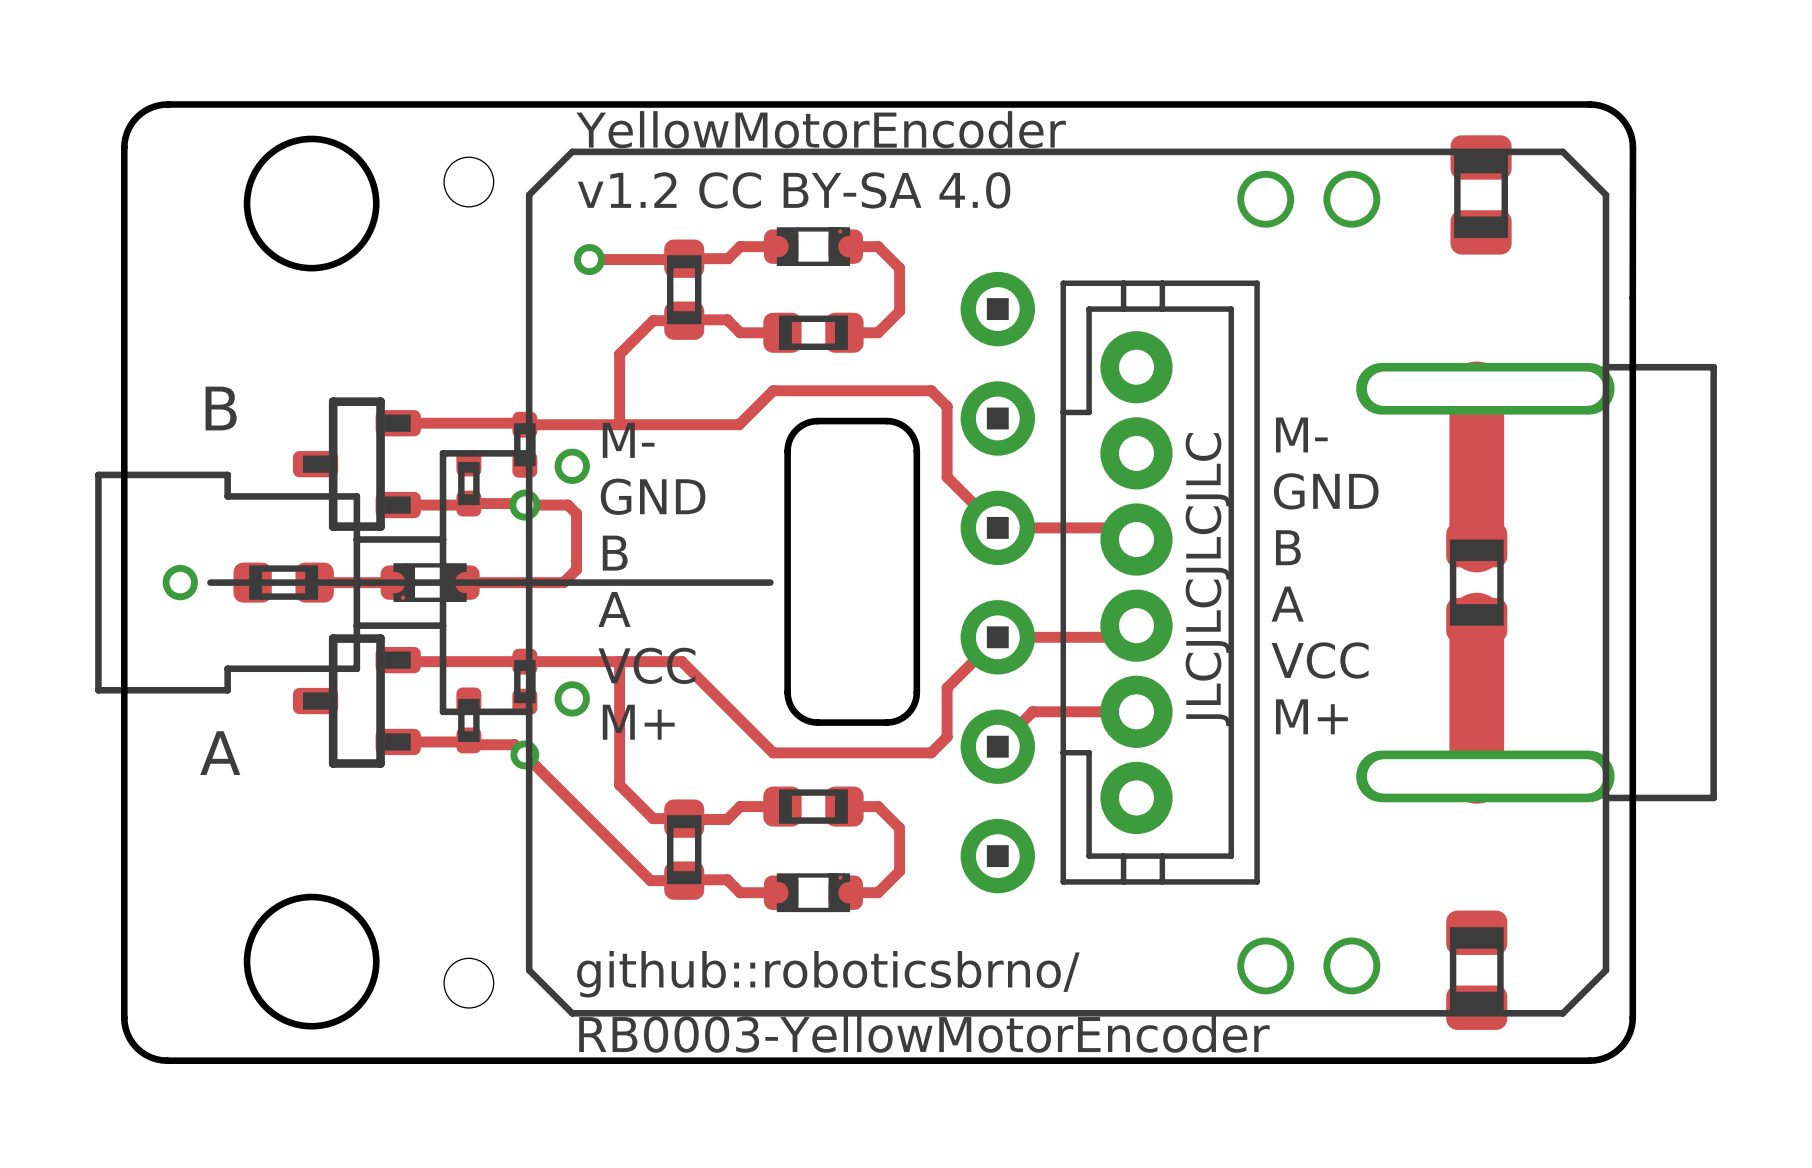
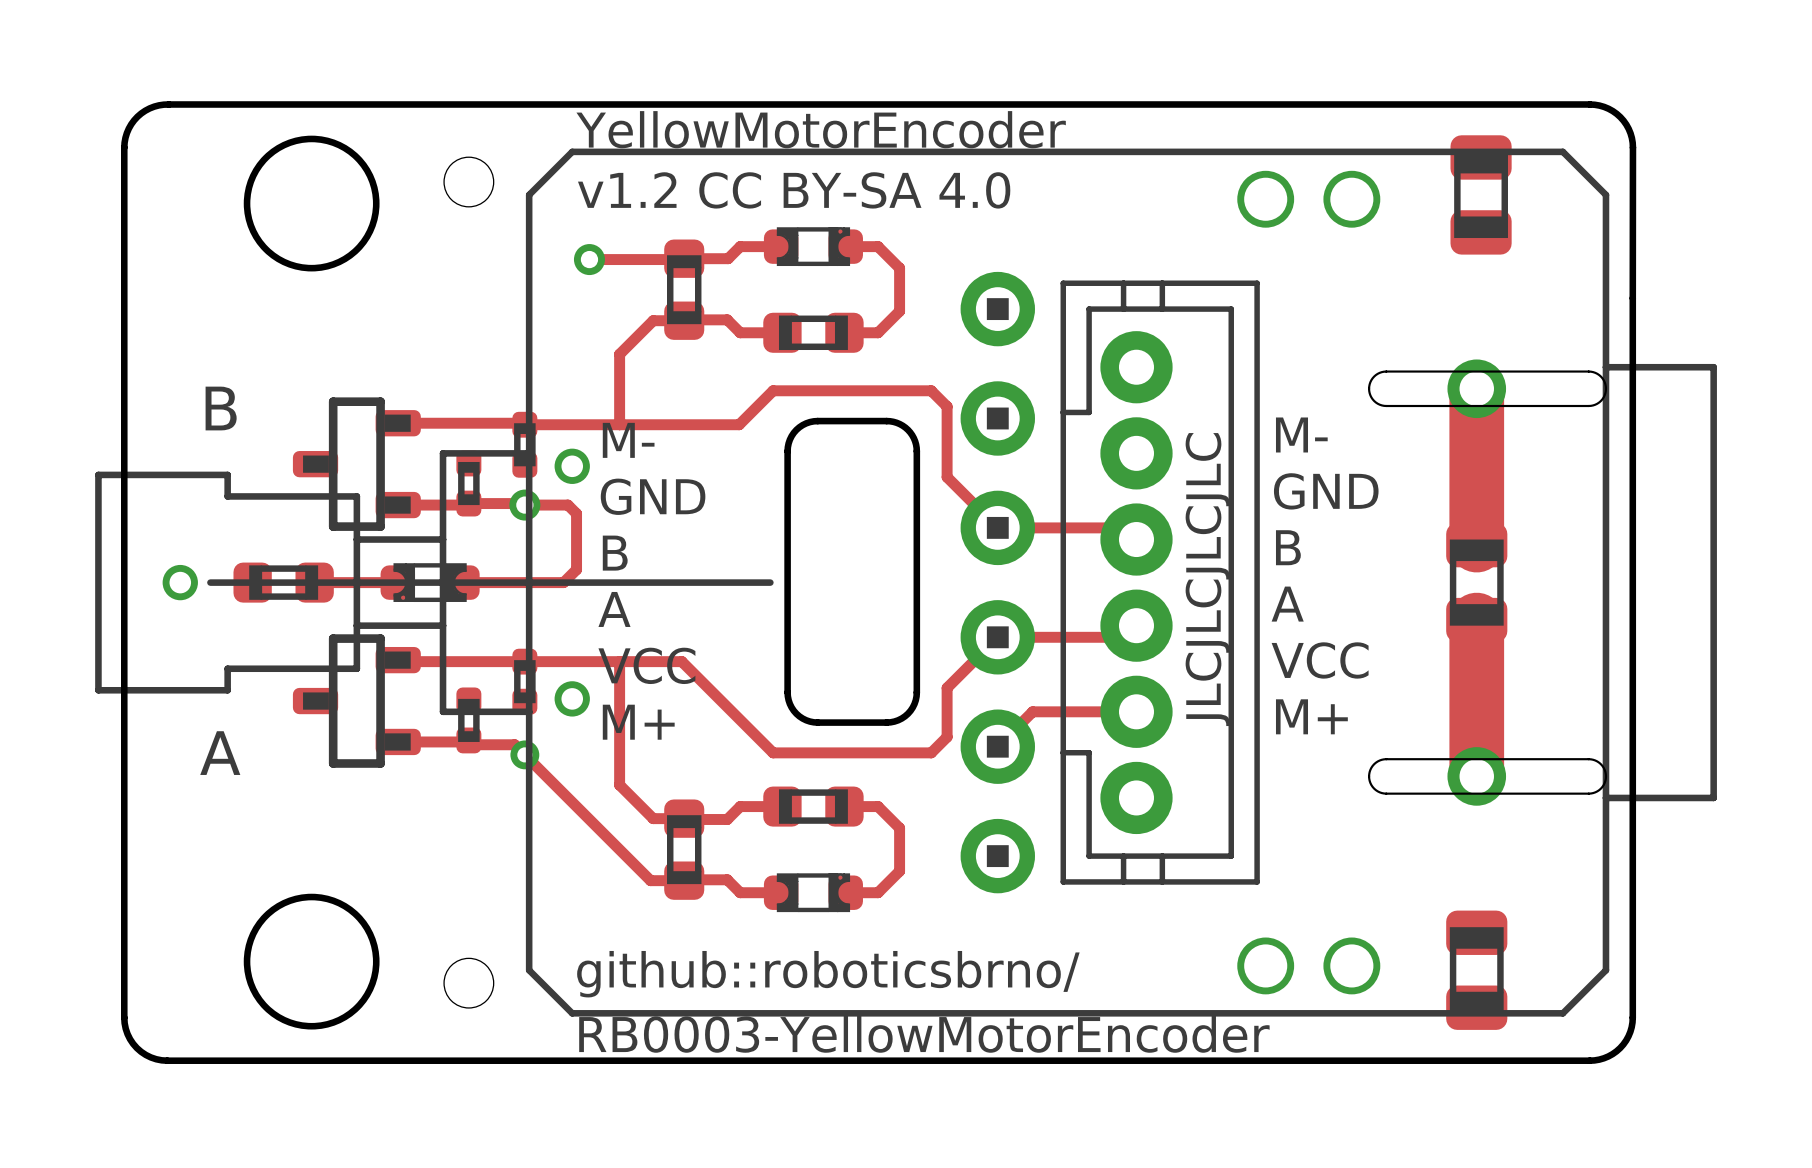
part footprint: [95, 148, 1717, 1017] -> [95, 148, 1717, 1017]

